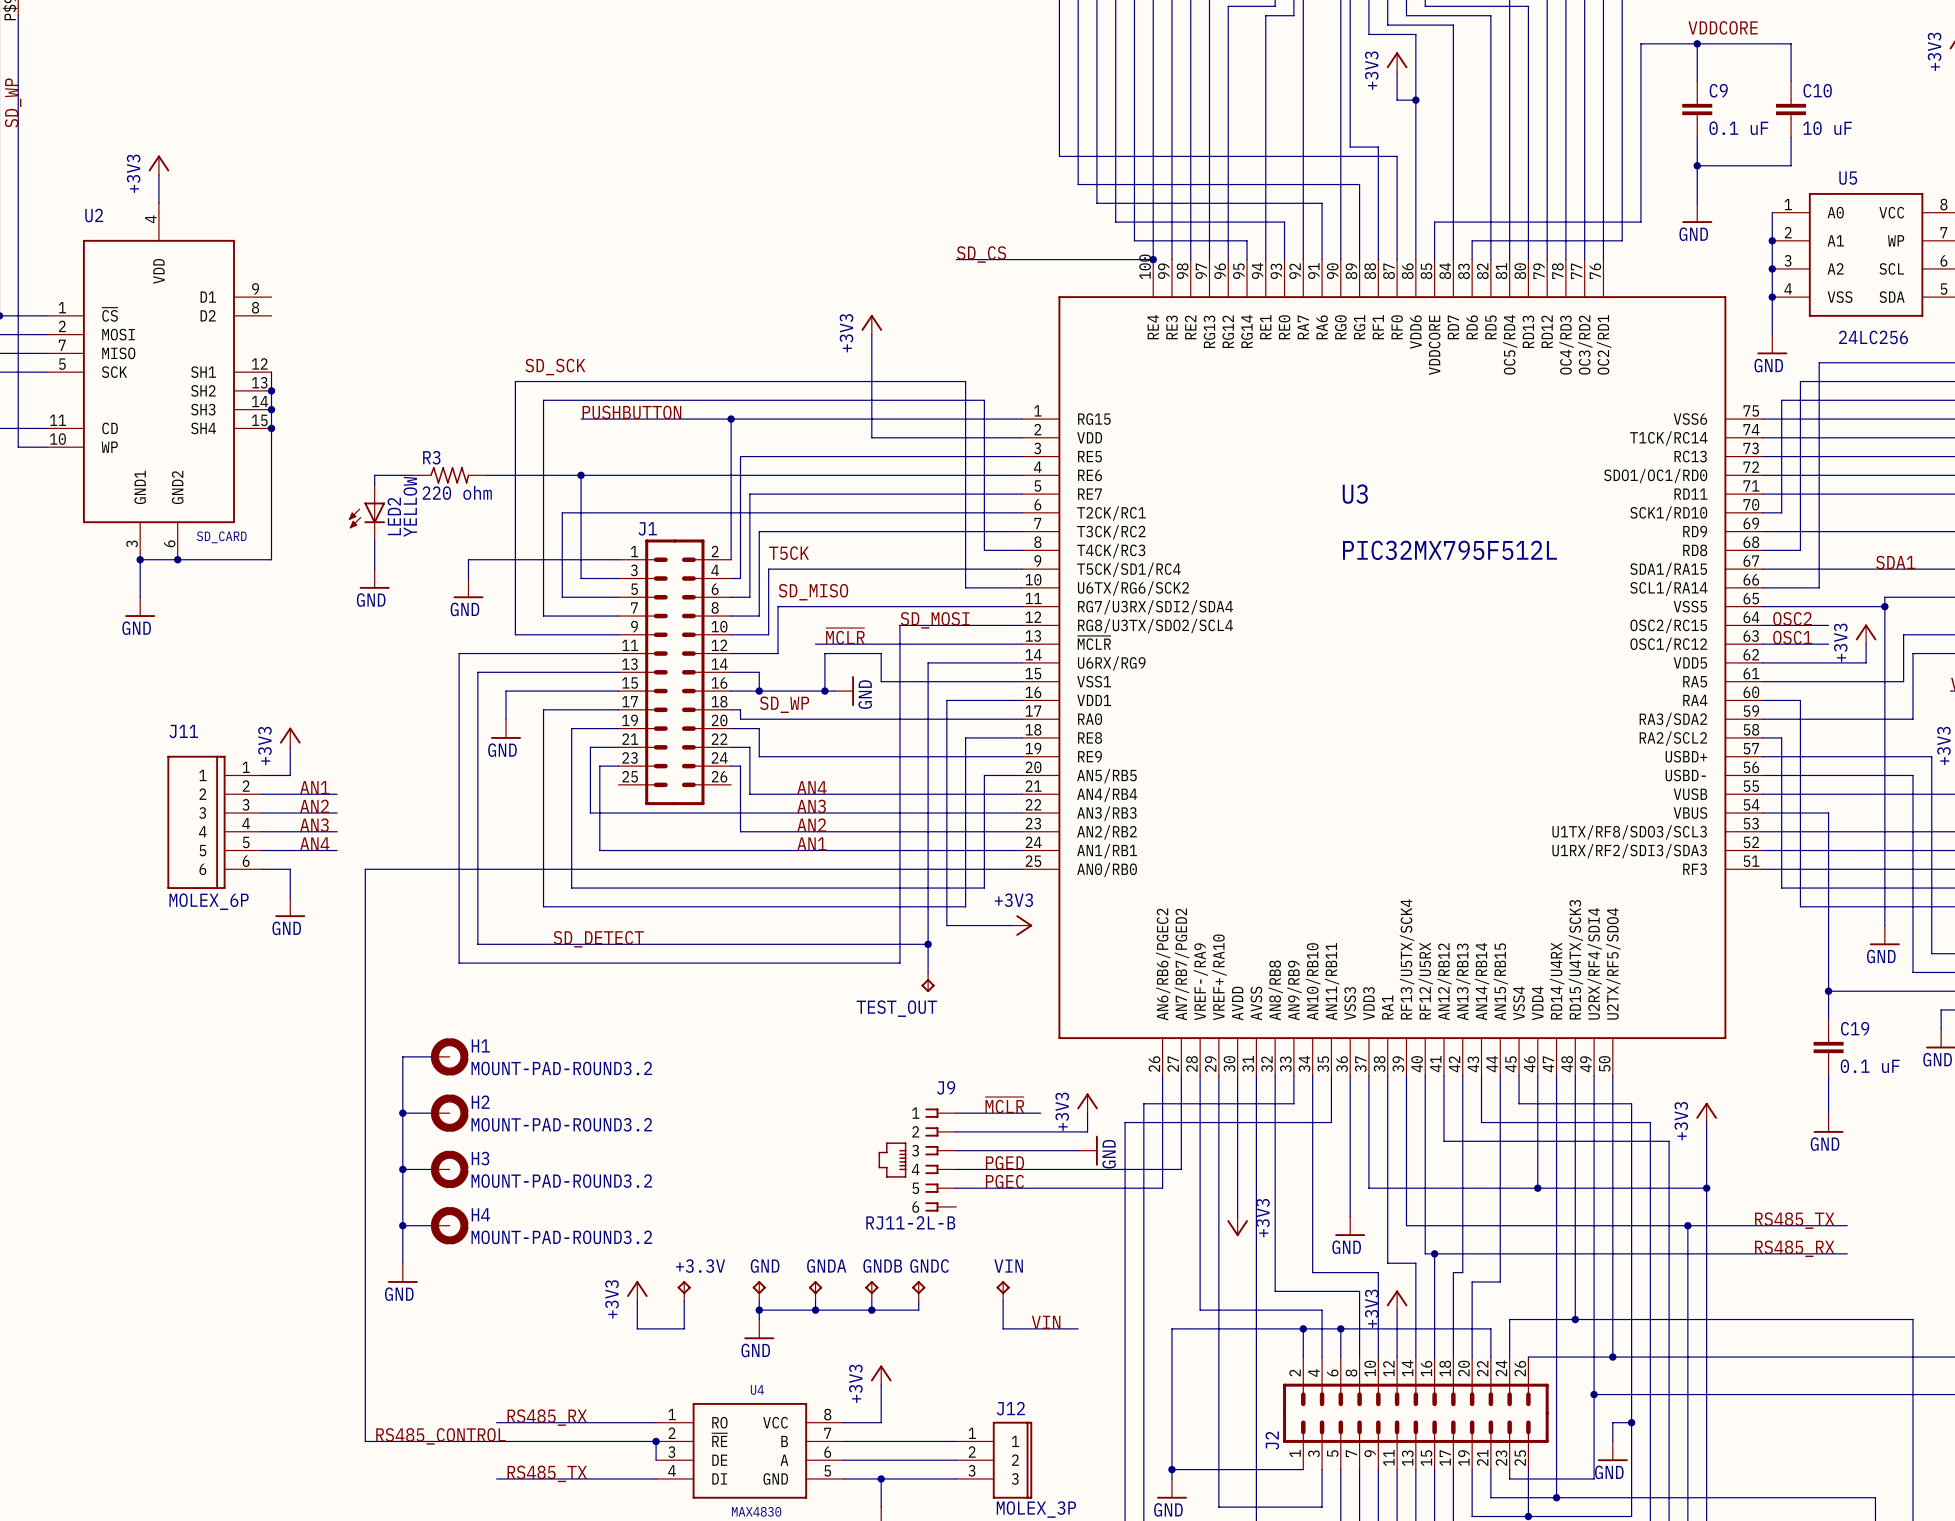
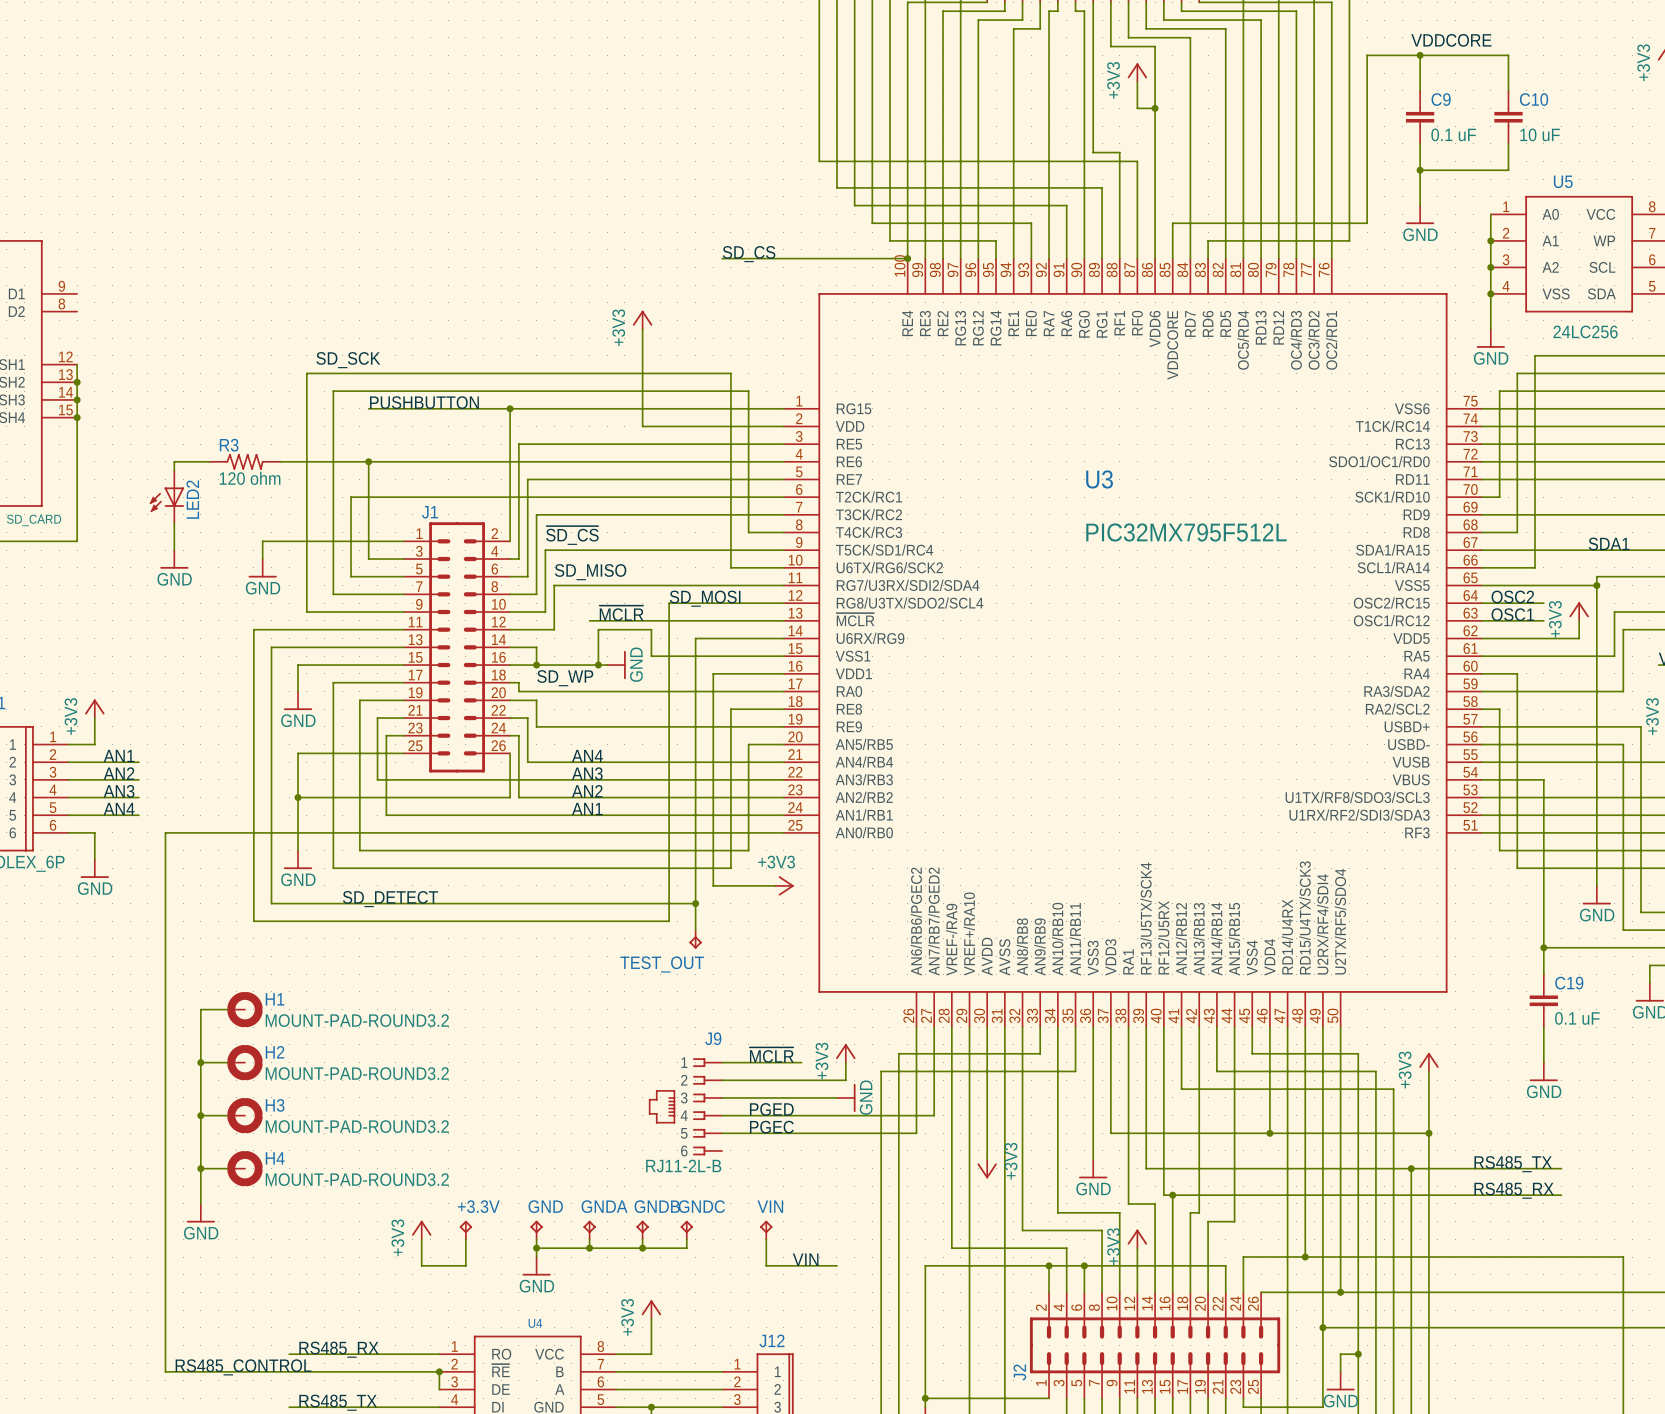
R3 value: 220 ohm (457, 492) -> 120 ohm (250, 478)
LED2 value: YELLOW (410, 506) -> none
label: T5CK (788, 553) -> ~{SD_CS} (572, 535)
wire: none -> (404, 753) (298, 753) (298, 850)
wire: none -> (510, 753) (510, 797) (298, 797)
junction: none -> (298, 797)
power symbol: none -> GND (298, 859)

